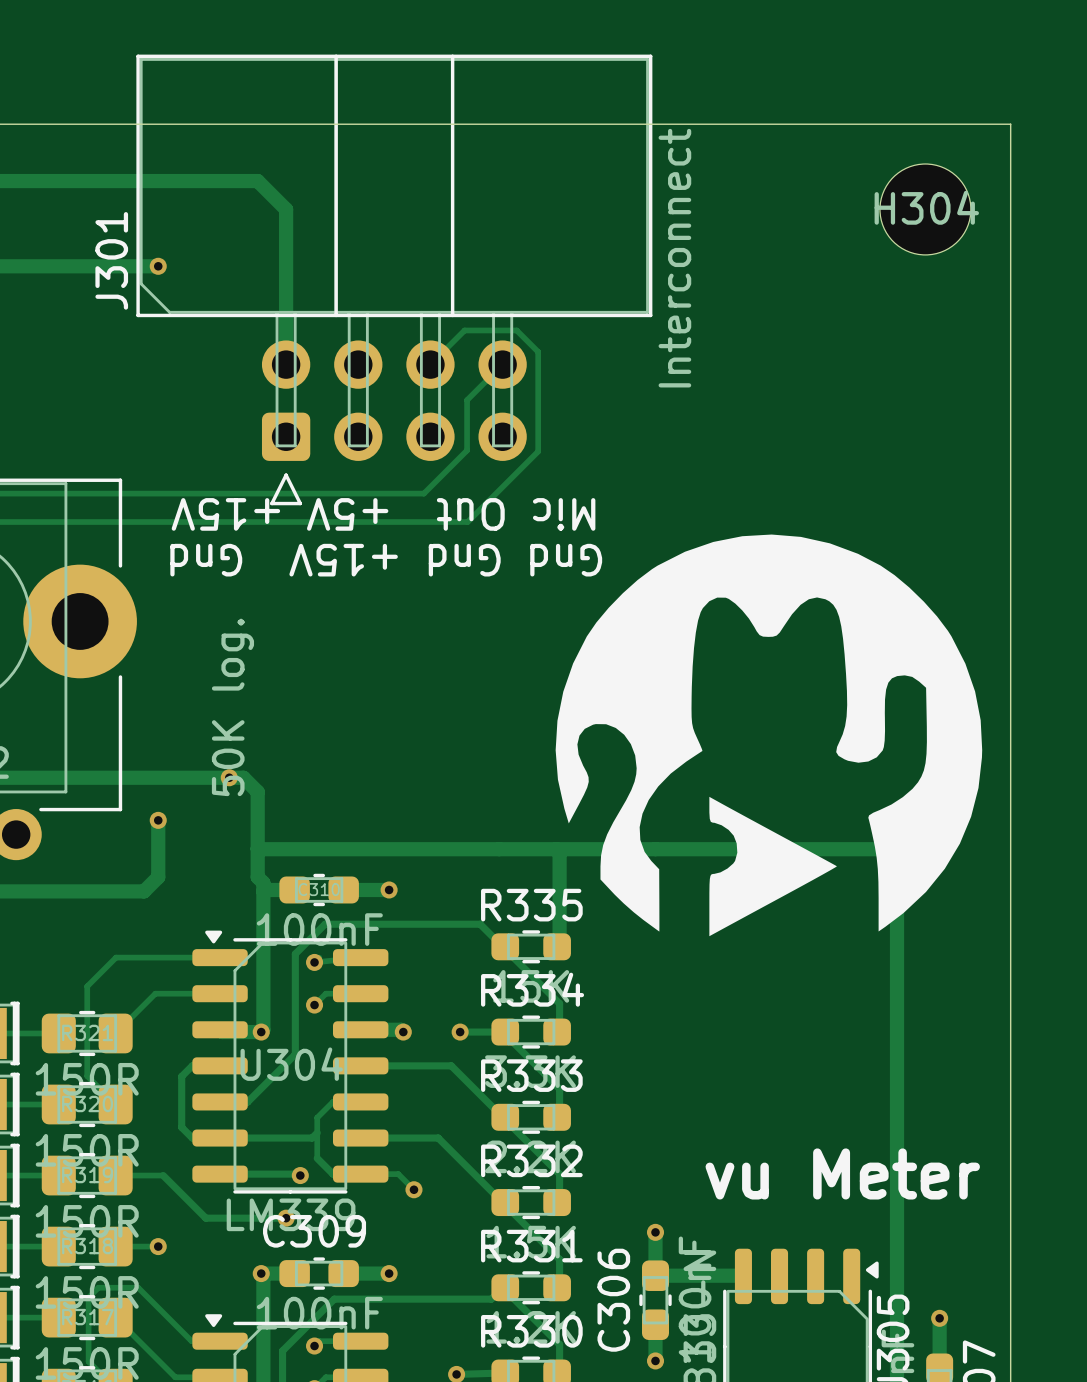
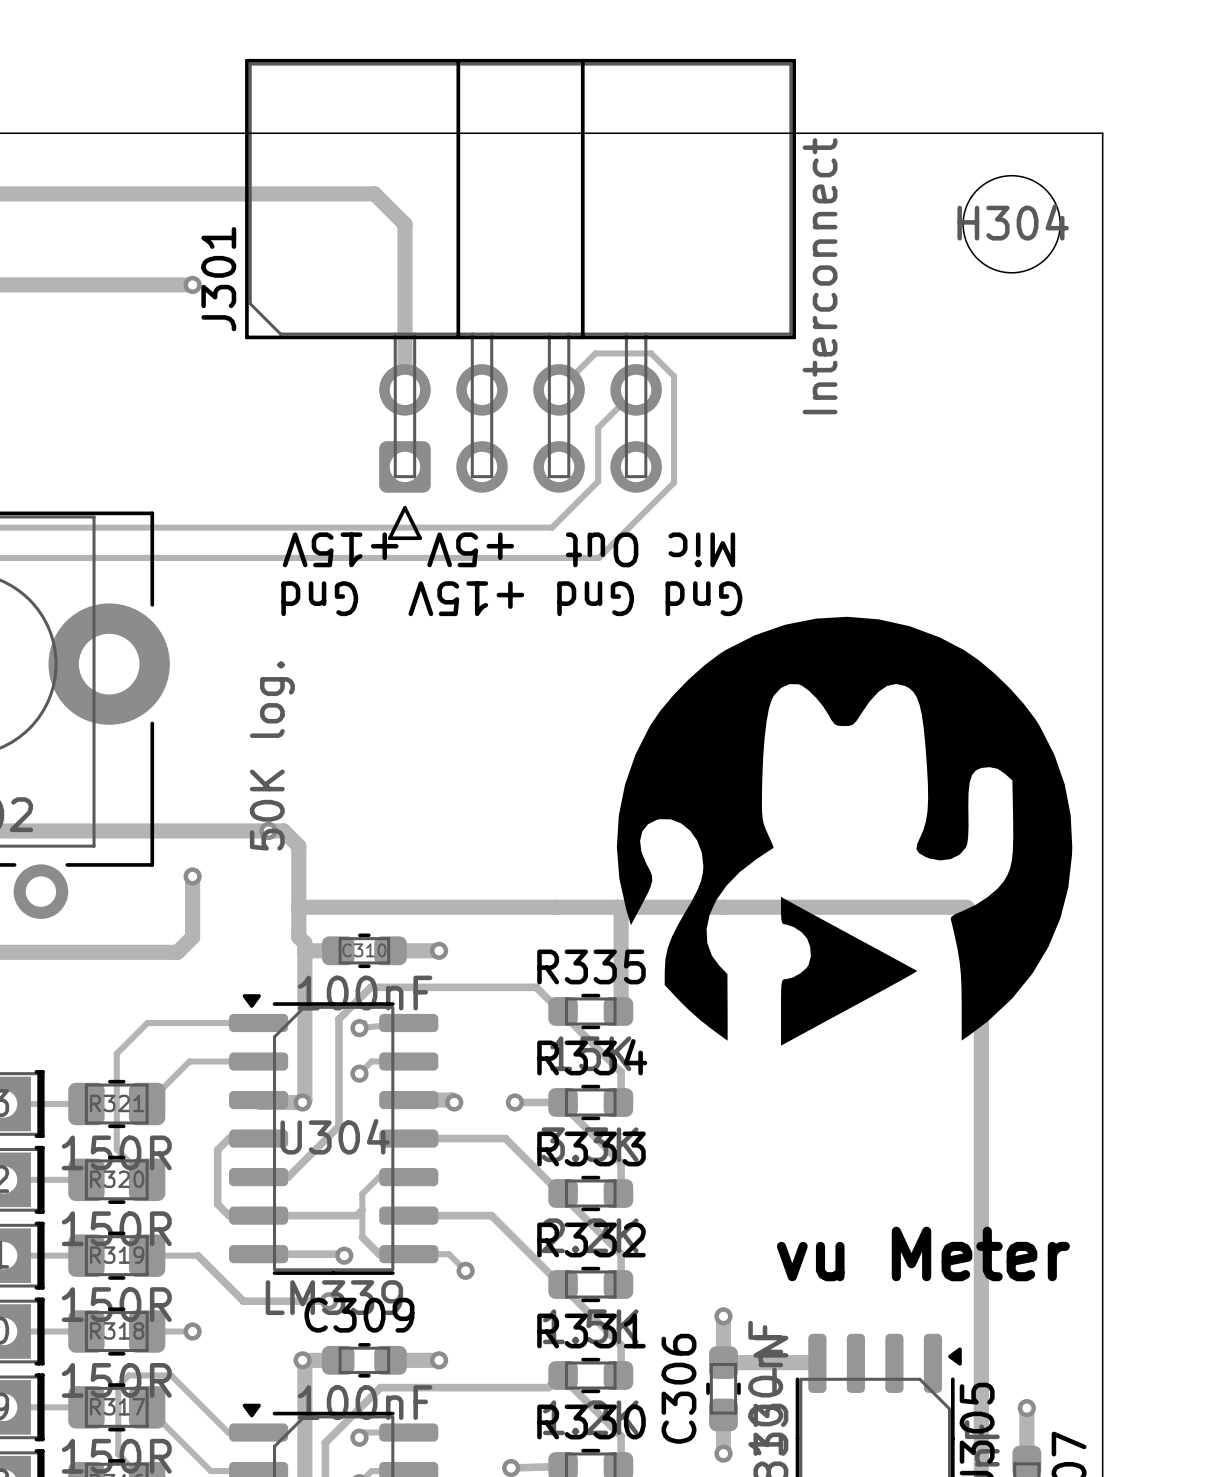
track: (257, 181) (286, 209) (286, 364) -> (298, 193) (374, 193) (404, 224) (404, 389)
J301 position: (394, 279) -> (520, 299)
track: (430, 364) (464, 330) (516, 330) (538, 351) (538, 400) -> (636, 389) (598, 427)
track: none -> (559, 389) (595, 353) (651, 353) (674, 376) (674, 482) (598, 557) (522, 557)
track: (502, 364) (467, 400) (467, 450) (423, 493) -> none
track: (538, 450) (467, 522) -> (598, 481) (552, 527) (476, 527)
text position: Mic Out +5V +15V (383, 514) -> Mic Out +5V +15V (508, 549)
text position: Gnd Gnd +15V Gnd (386, 560) -> Gnd Gnd +15V Gnd (511, 598)
drawing position: (768, 735) -> (844, 831)

